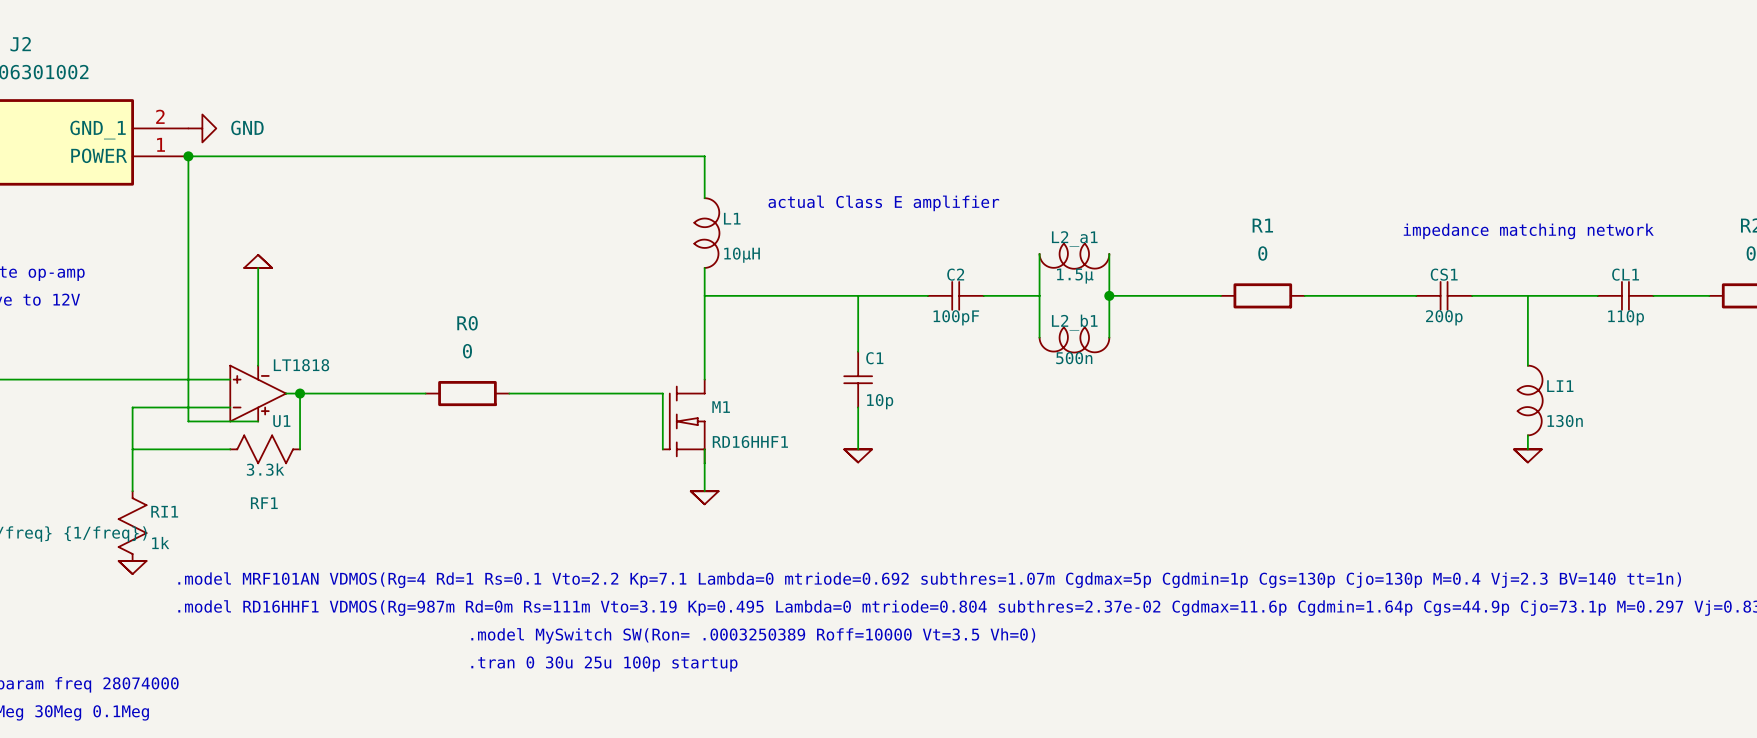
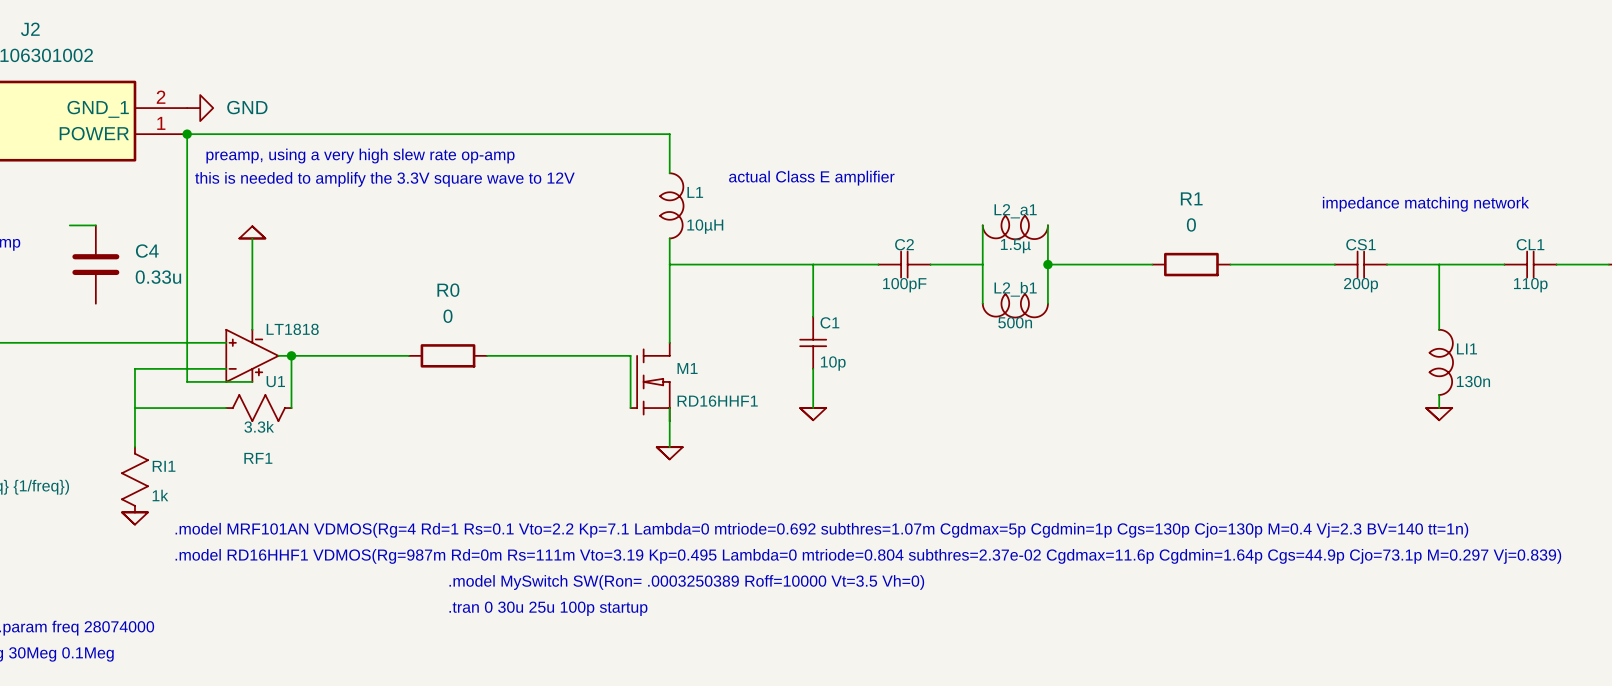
text: none -> preamp, using a very high slew rate op-amp (360, 156)
text: none -> this is needed to amplify the 3.3V square wave to 12V (384, 179)
wire: none -> (69, 225) (95, 225)
C4: none -> 0.33u (95, 264)

